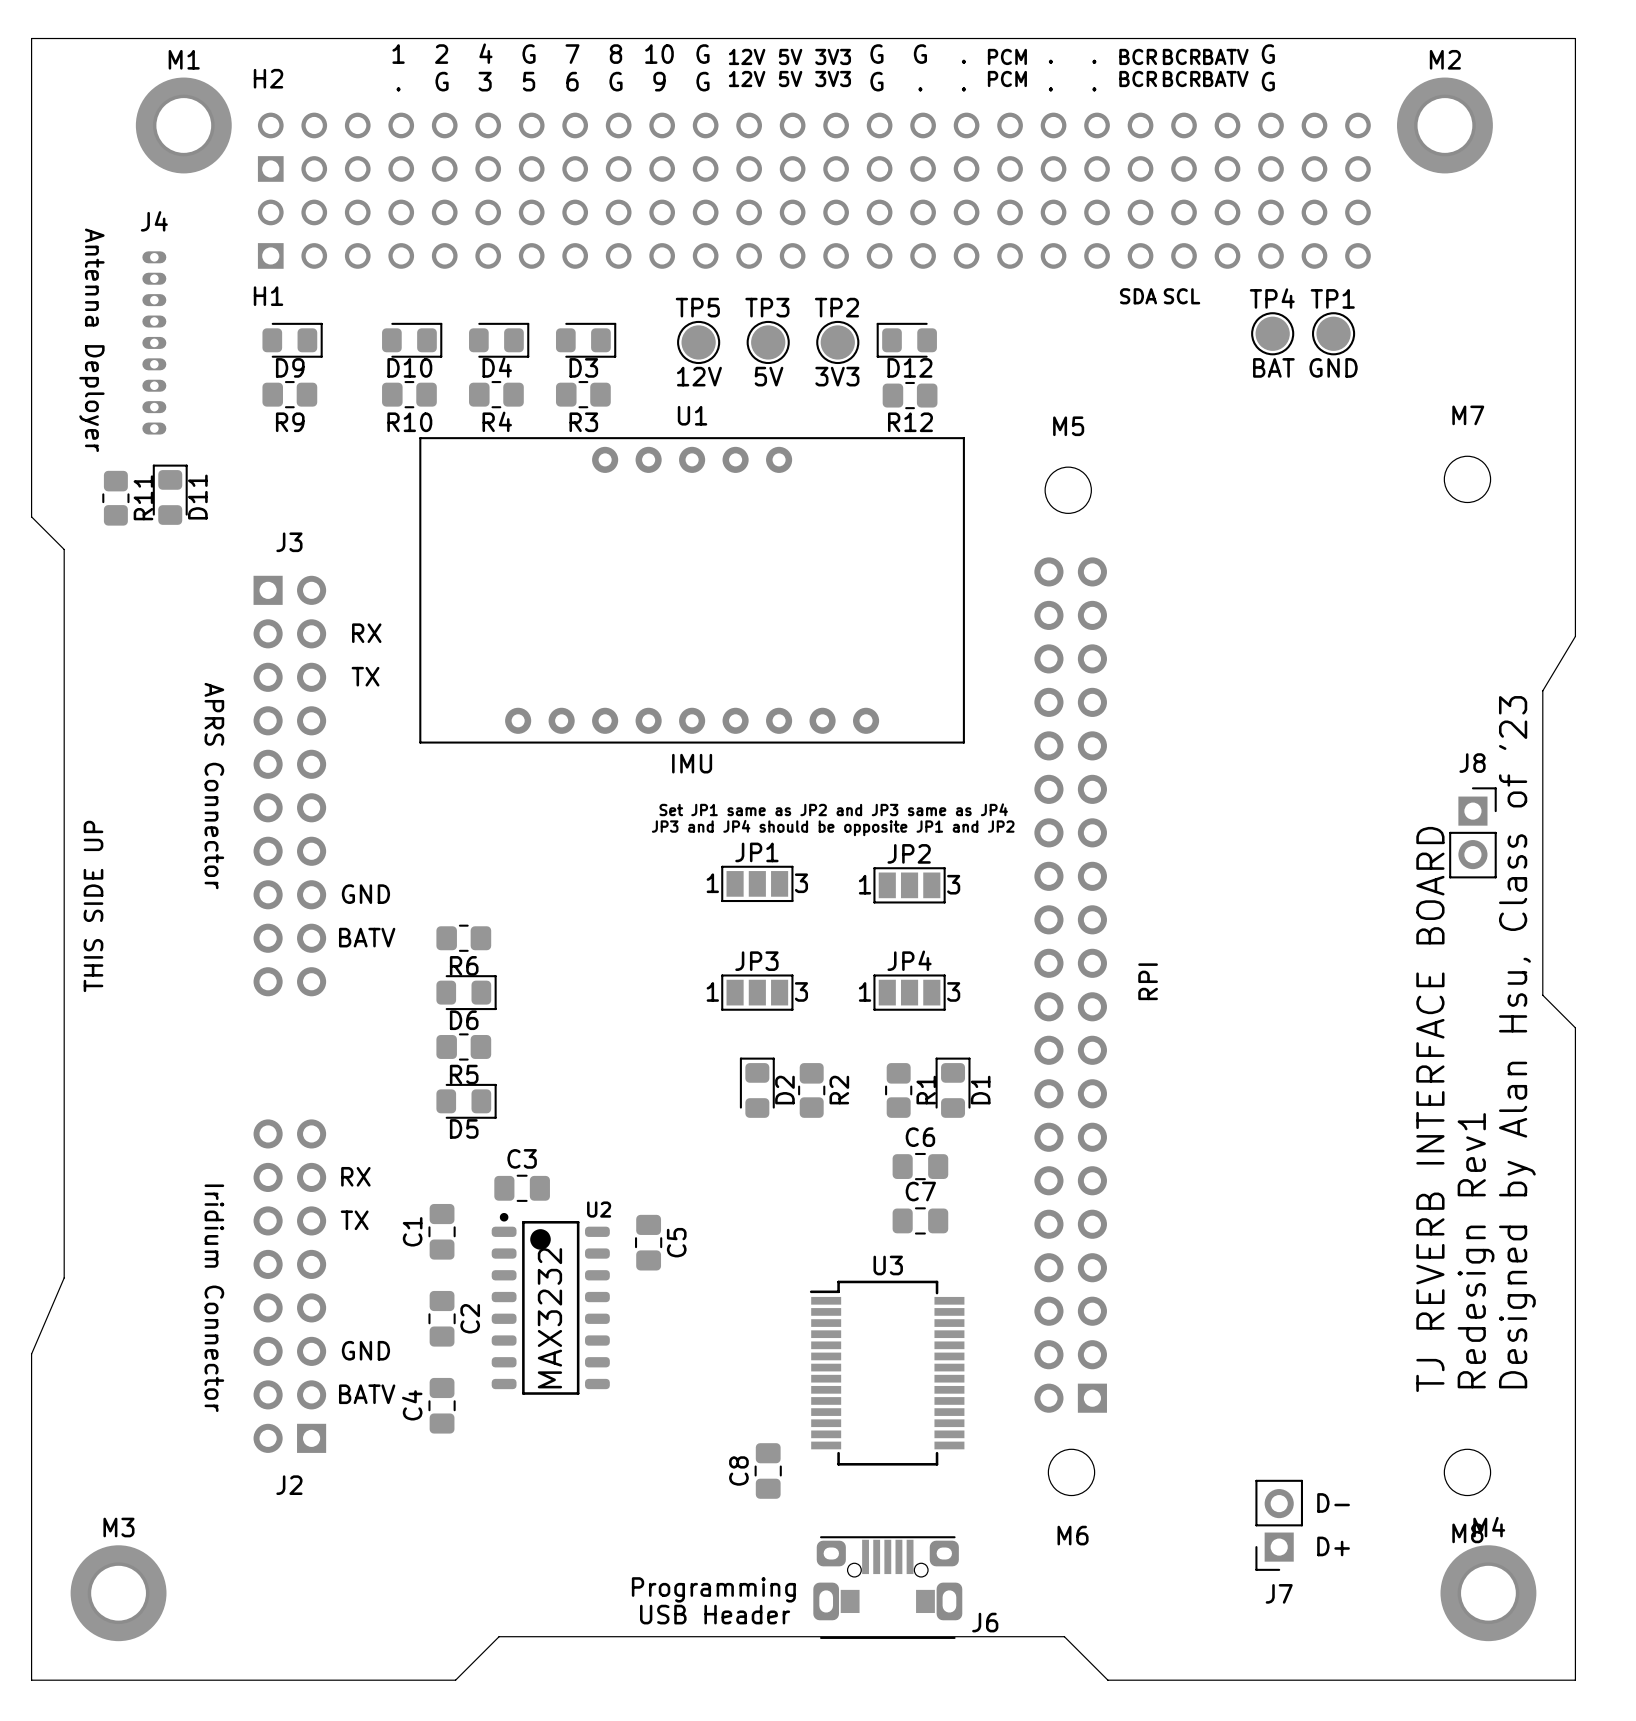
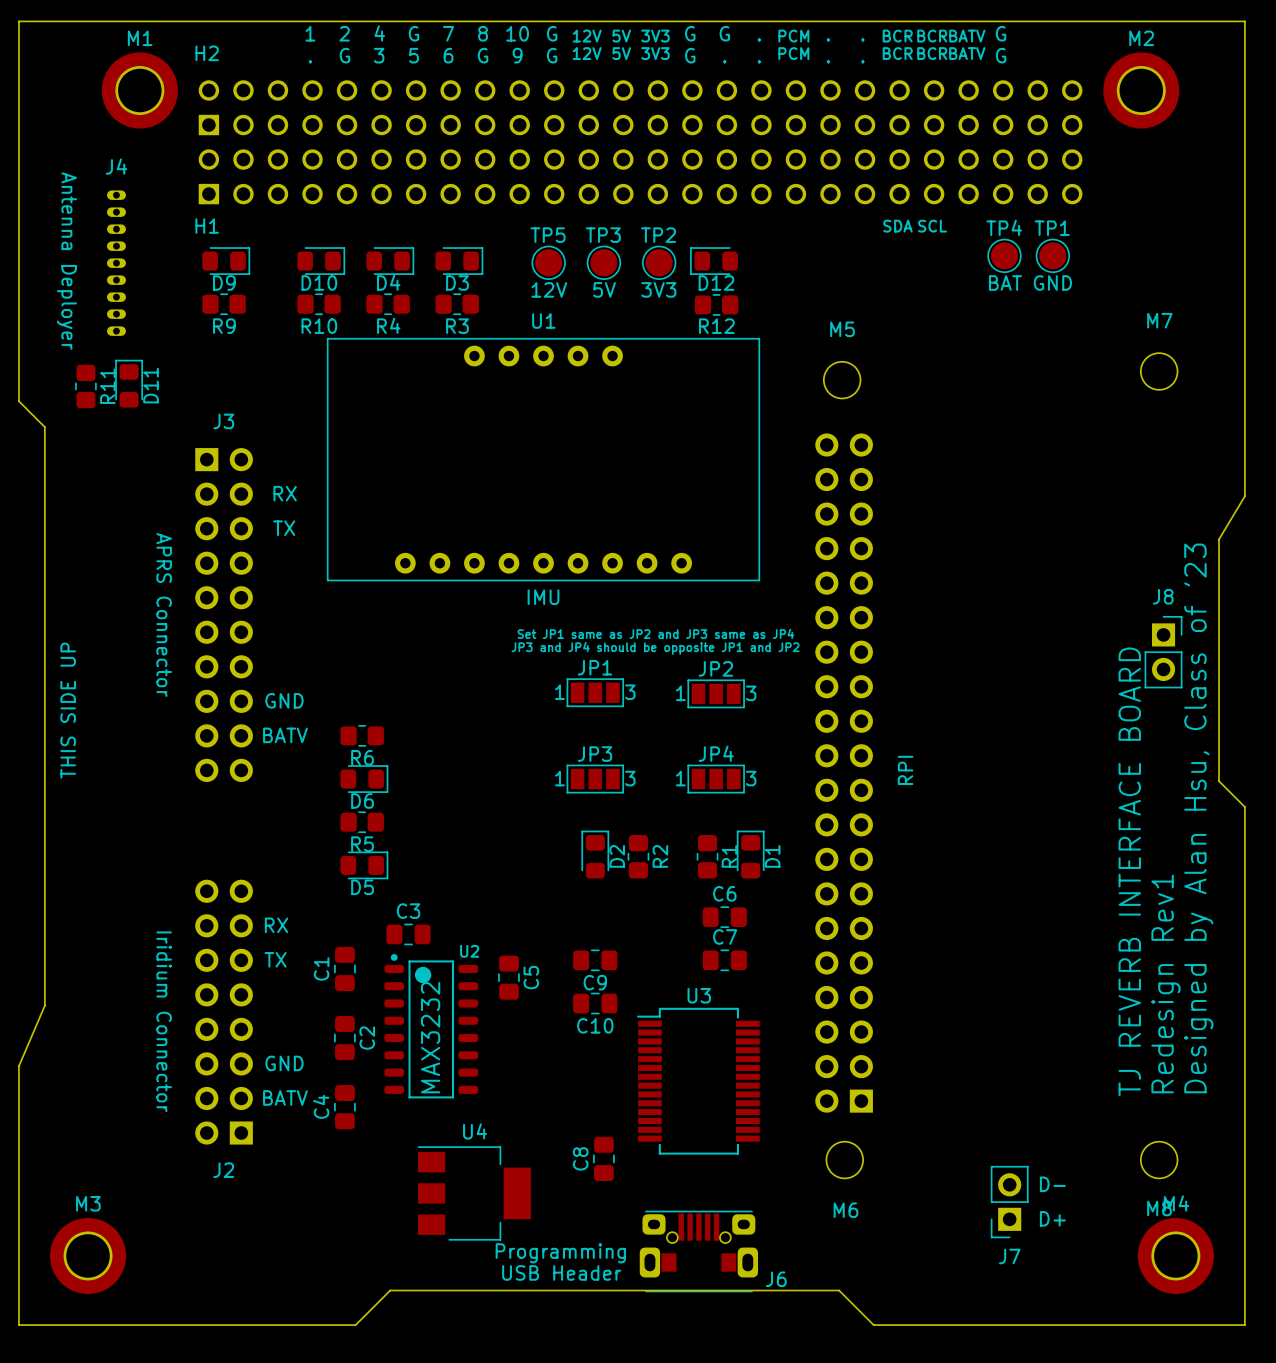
C9: none -> (595, 960)
C10: none -> (595, 1003)
U4: none -> (474, 1193)

